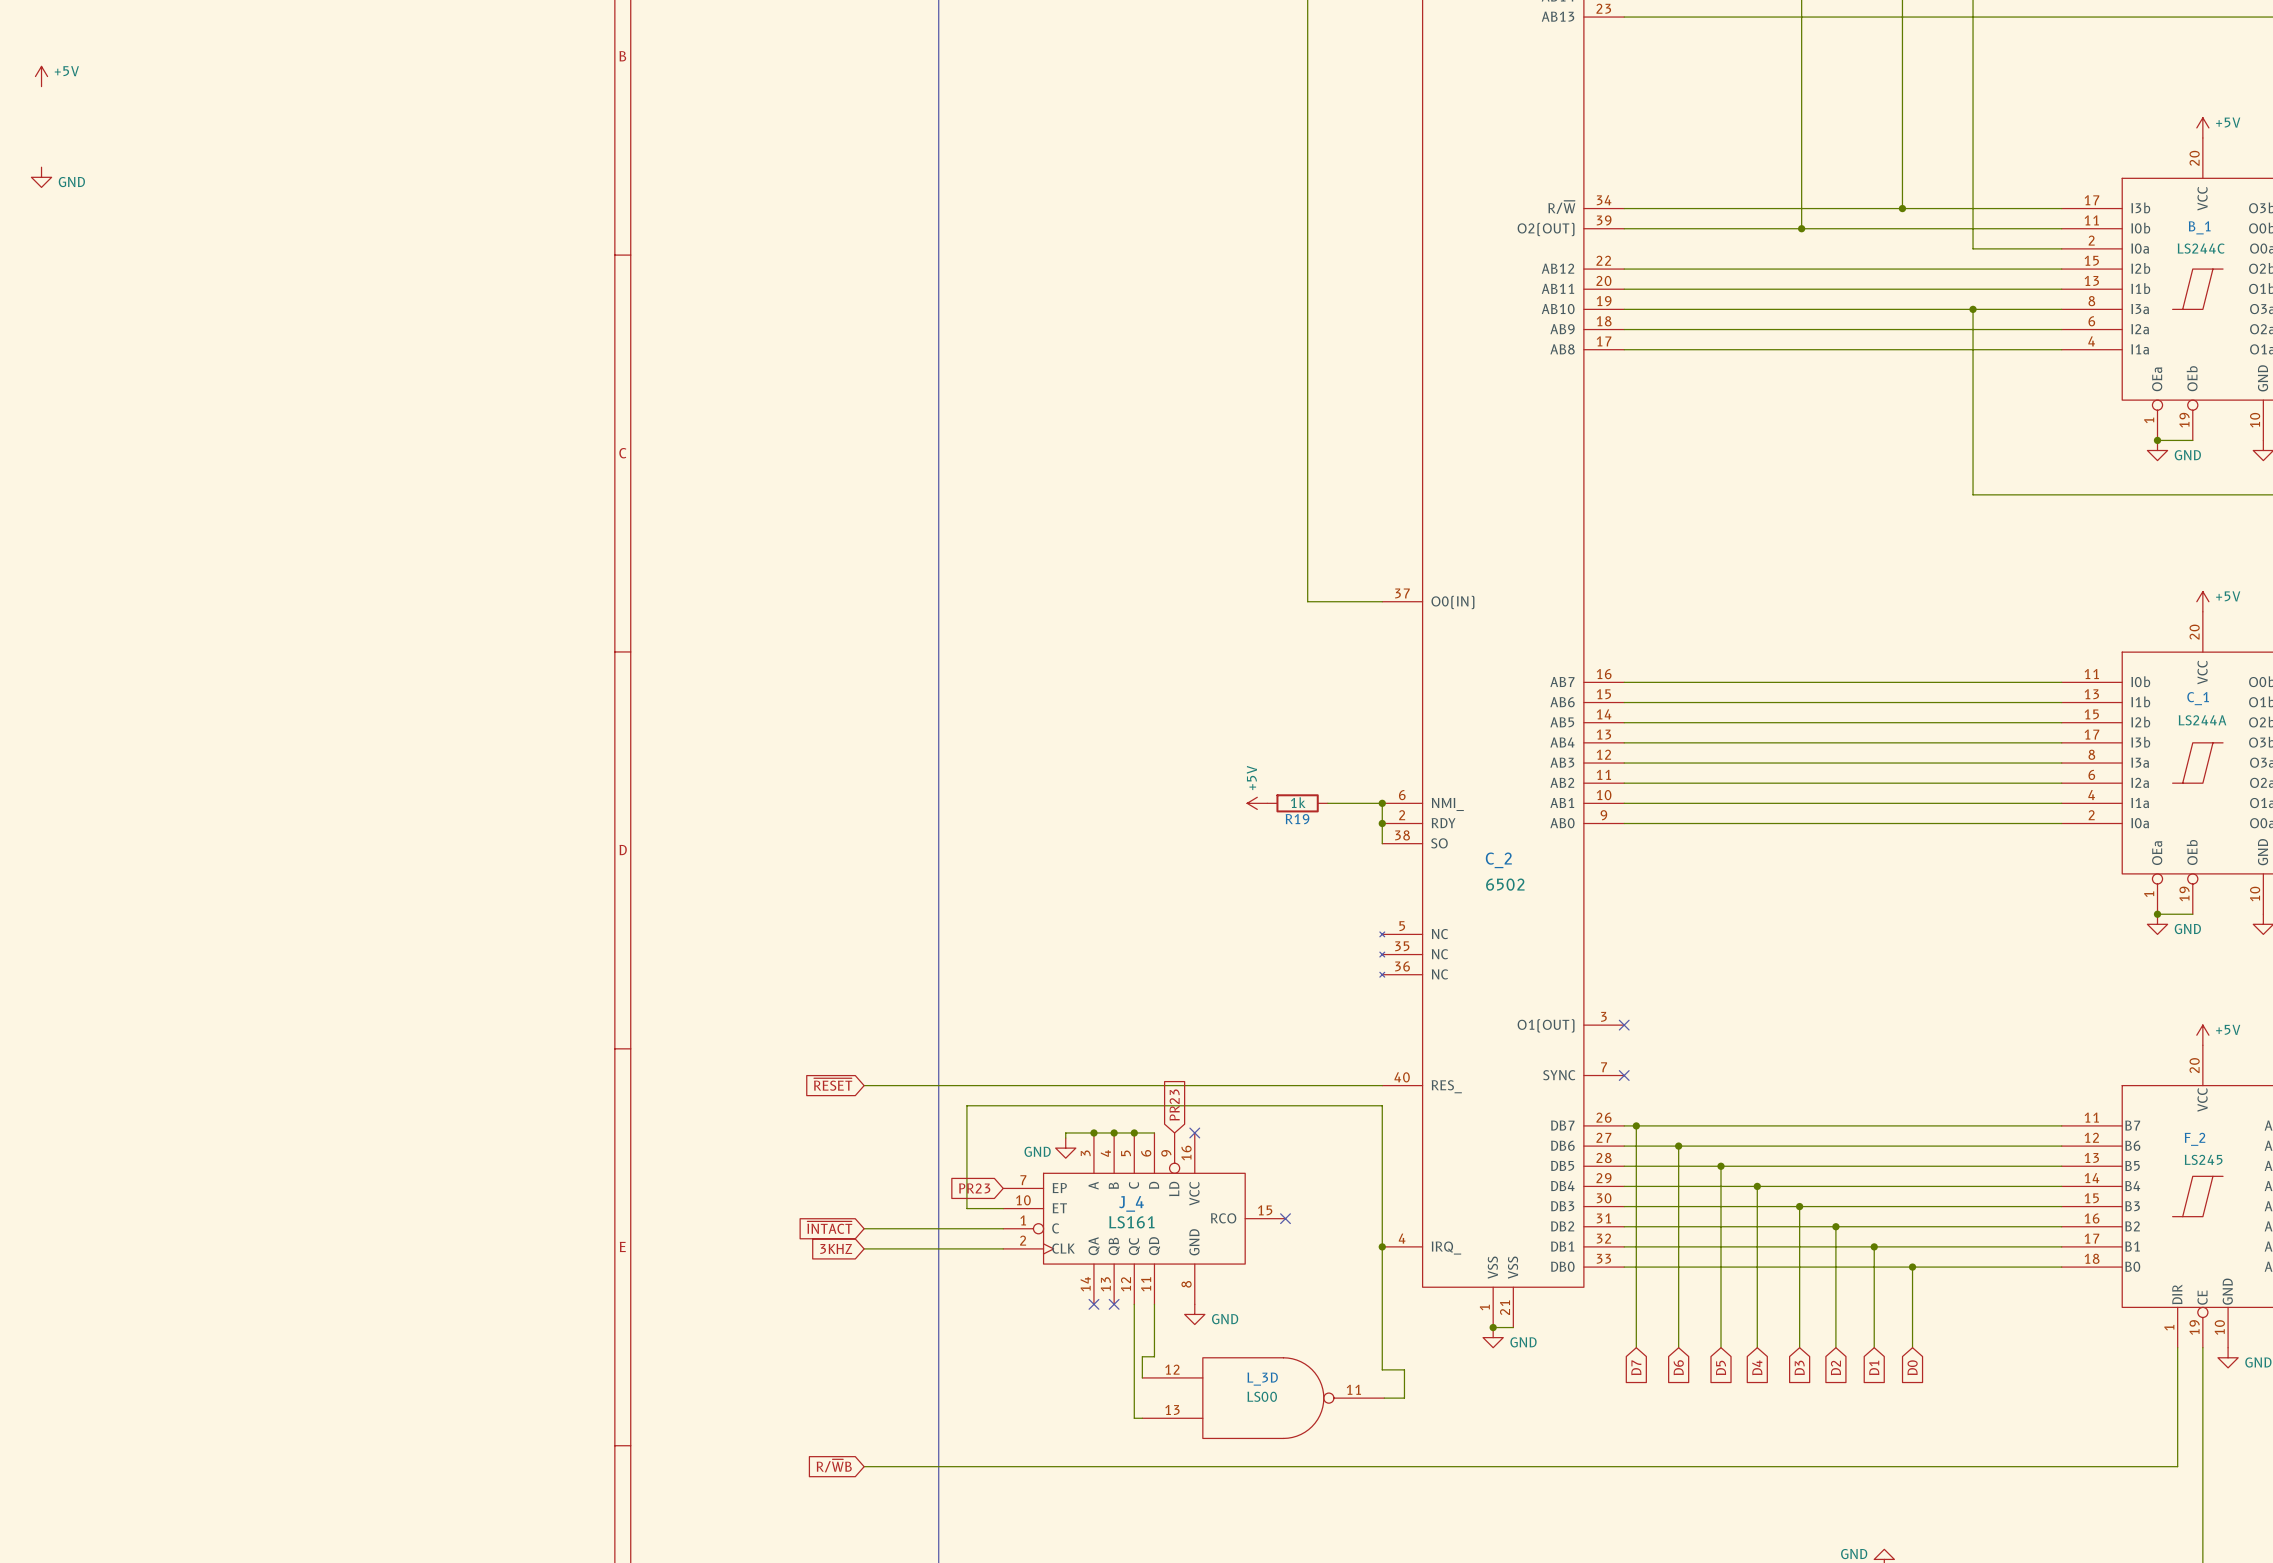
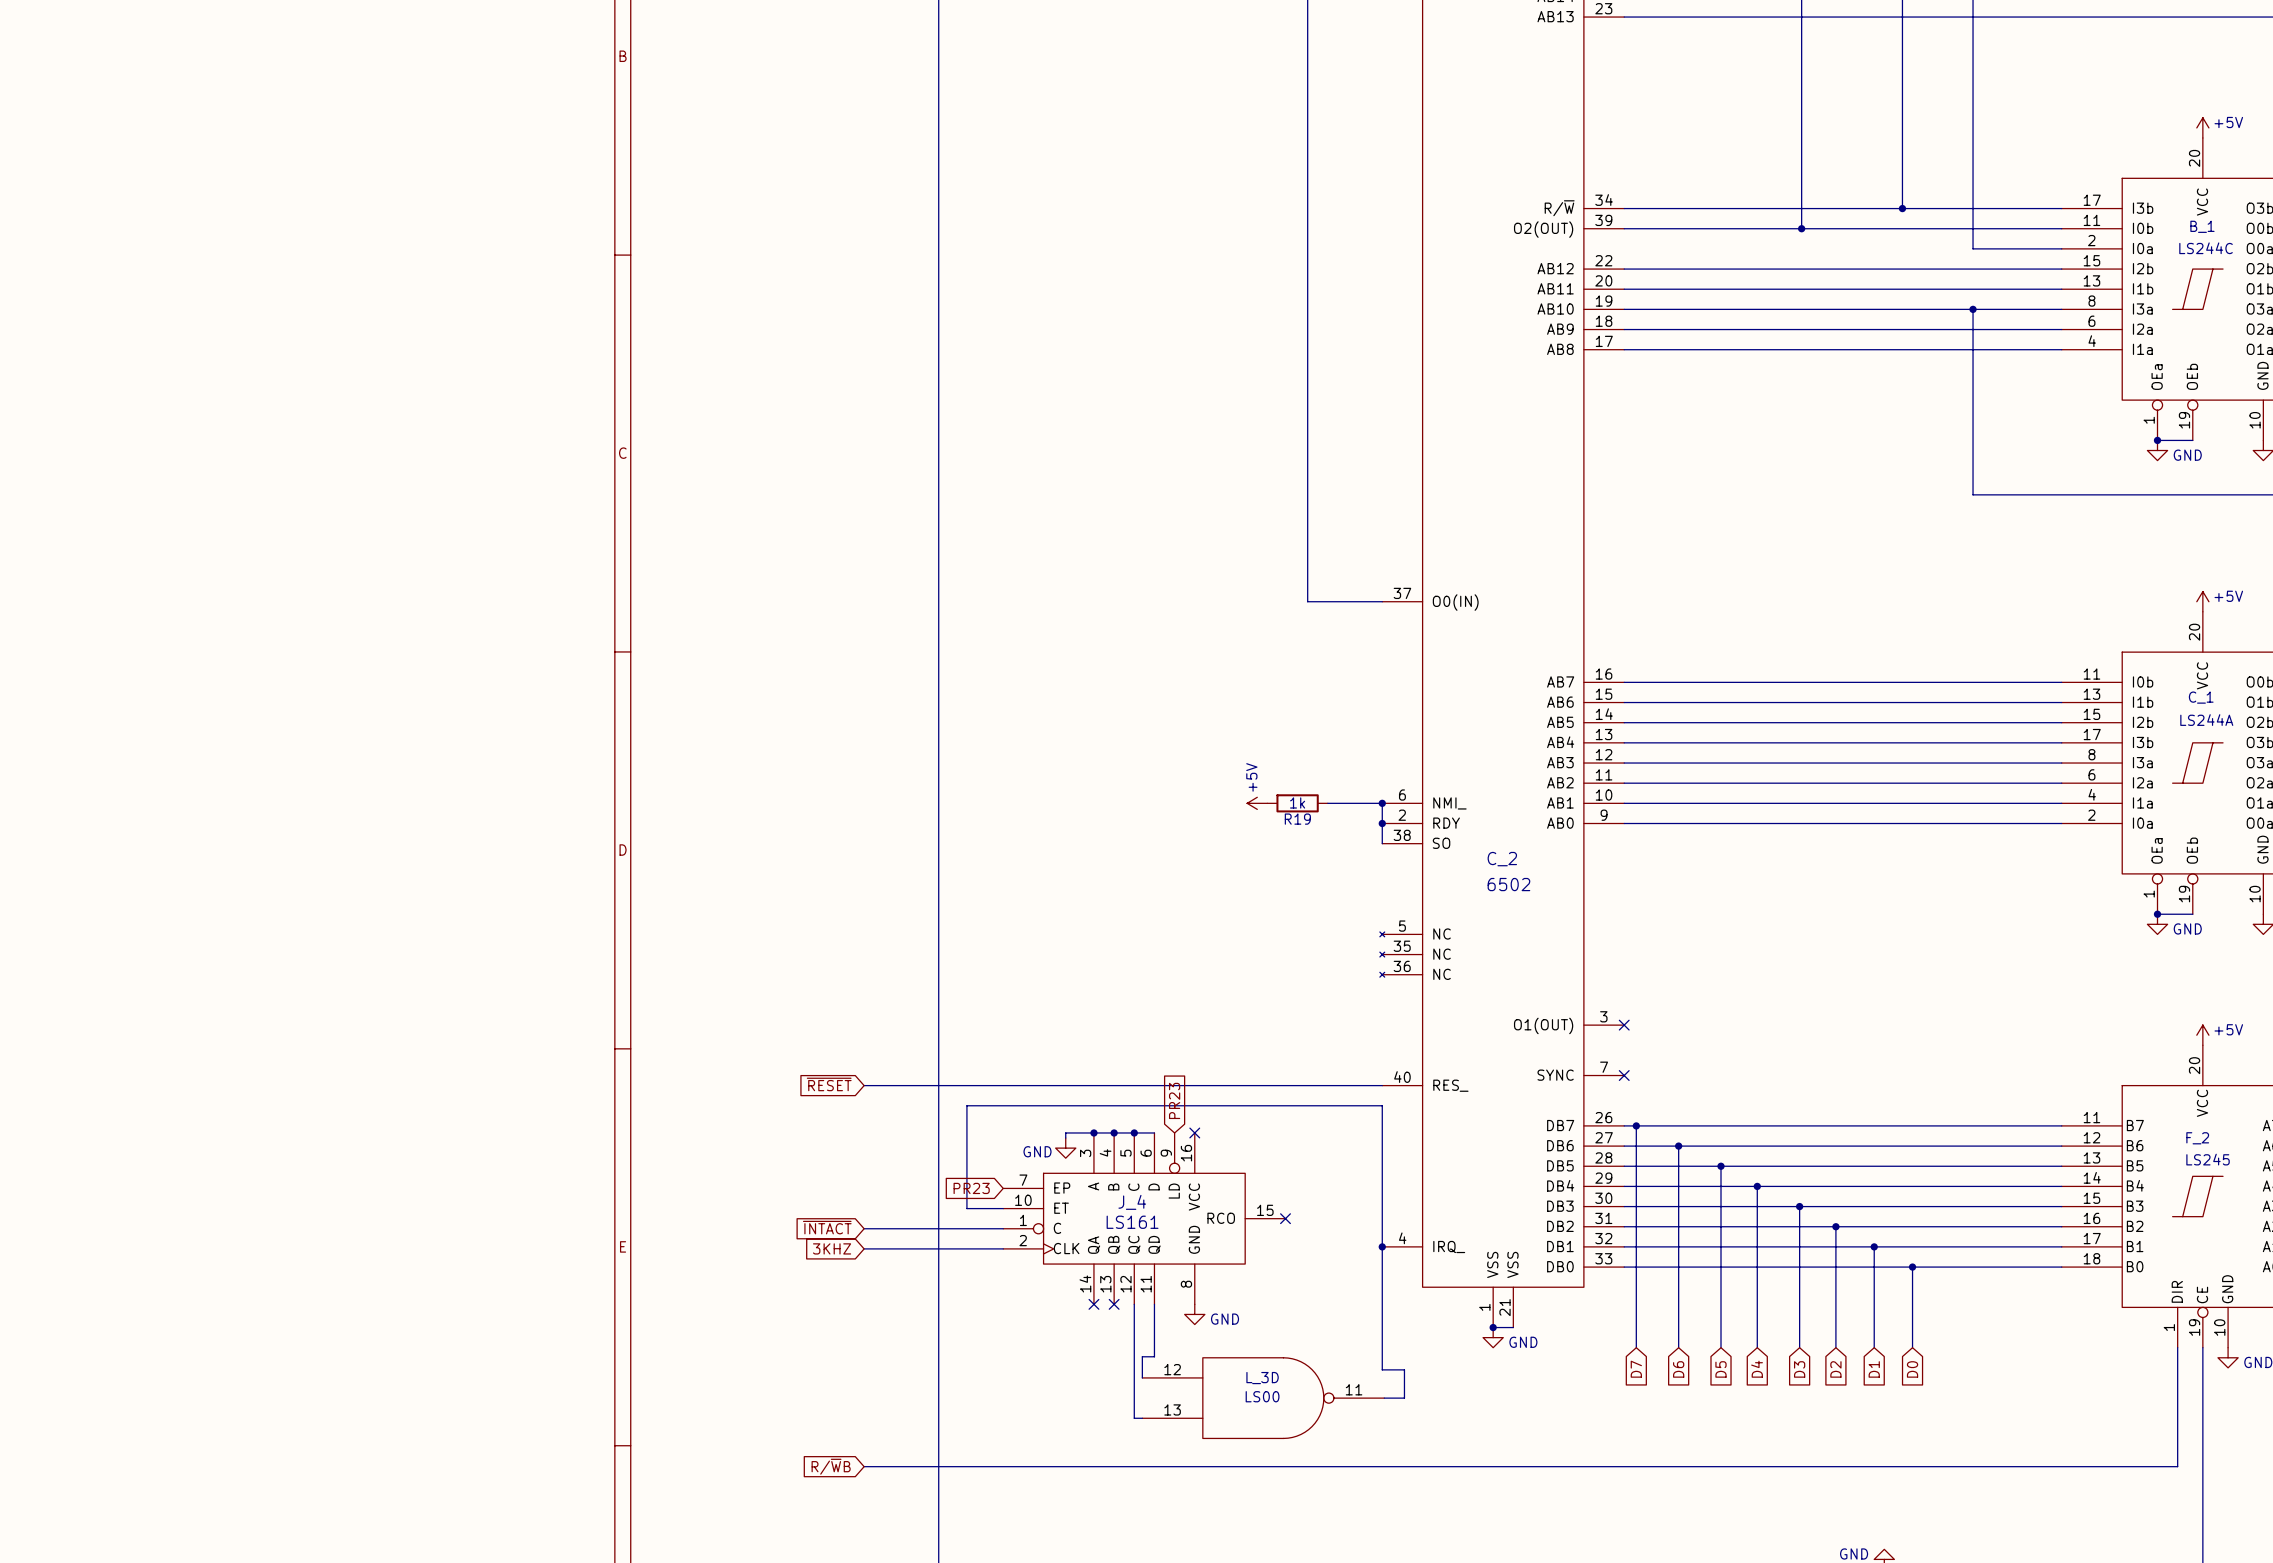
power symbol: +5V (41, 76) -> none
power symbol: GND (41, 177) -> none

